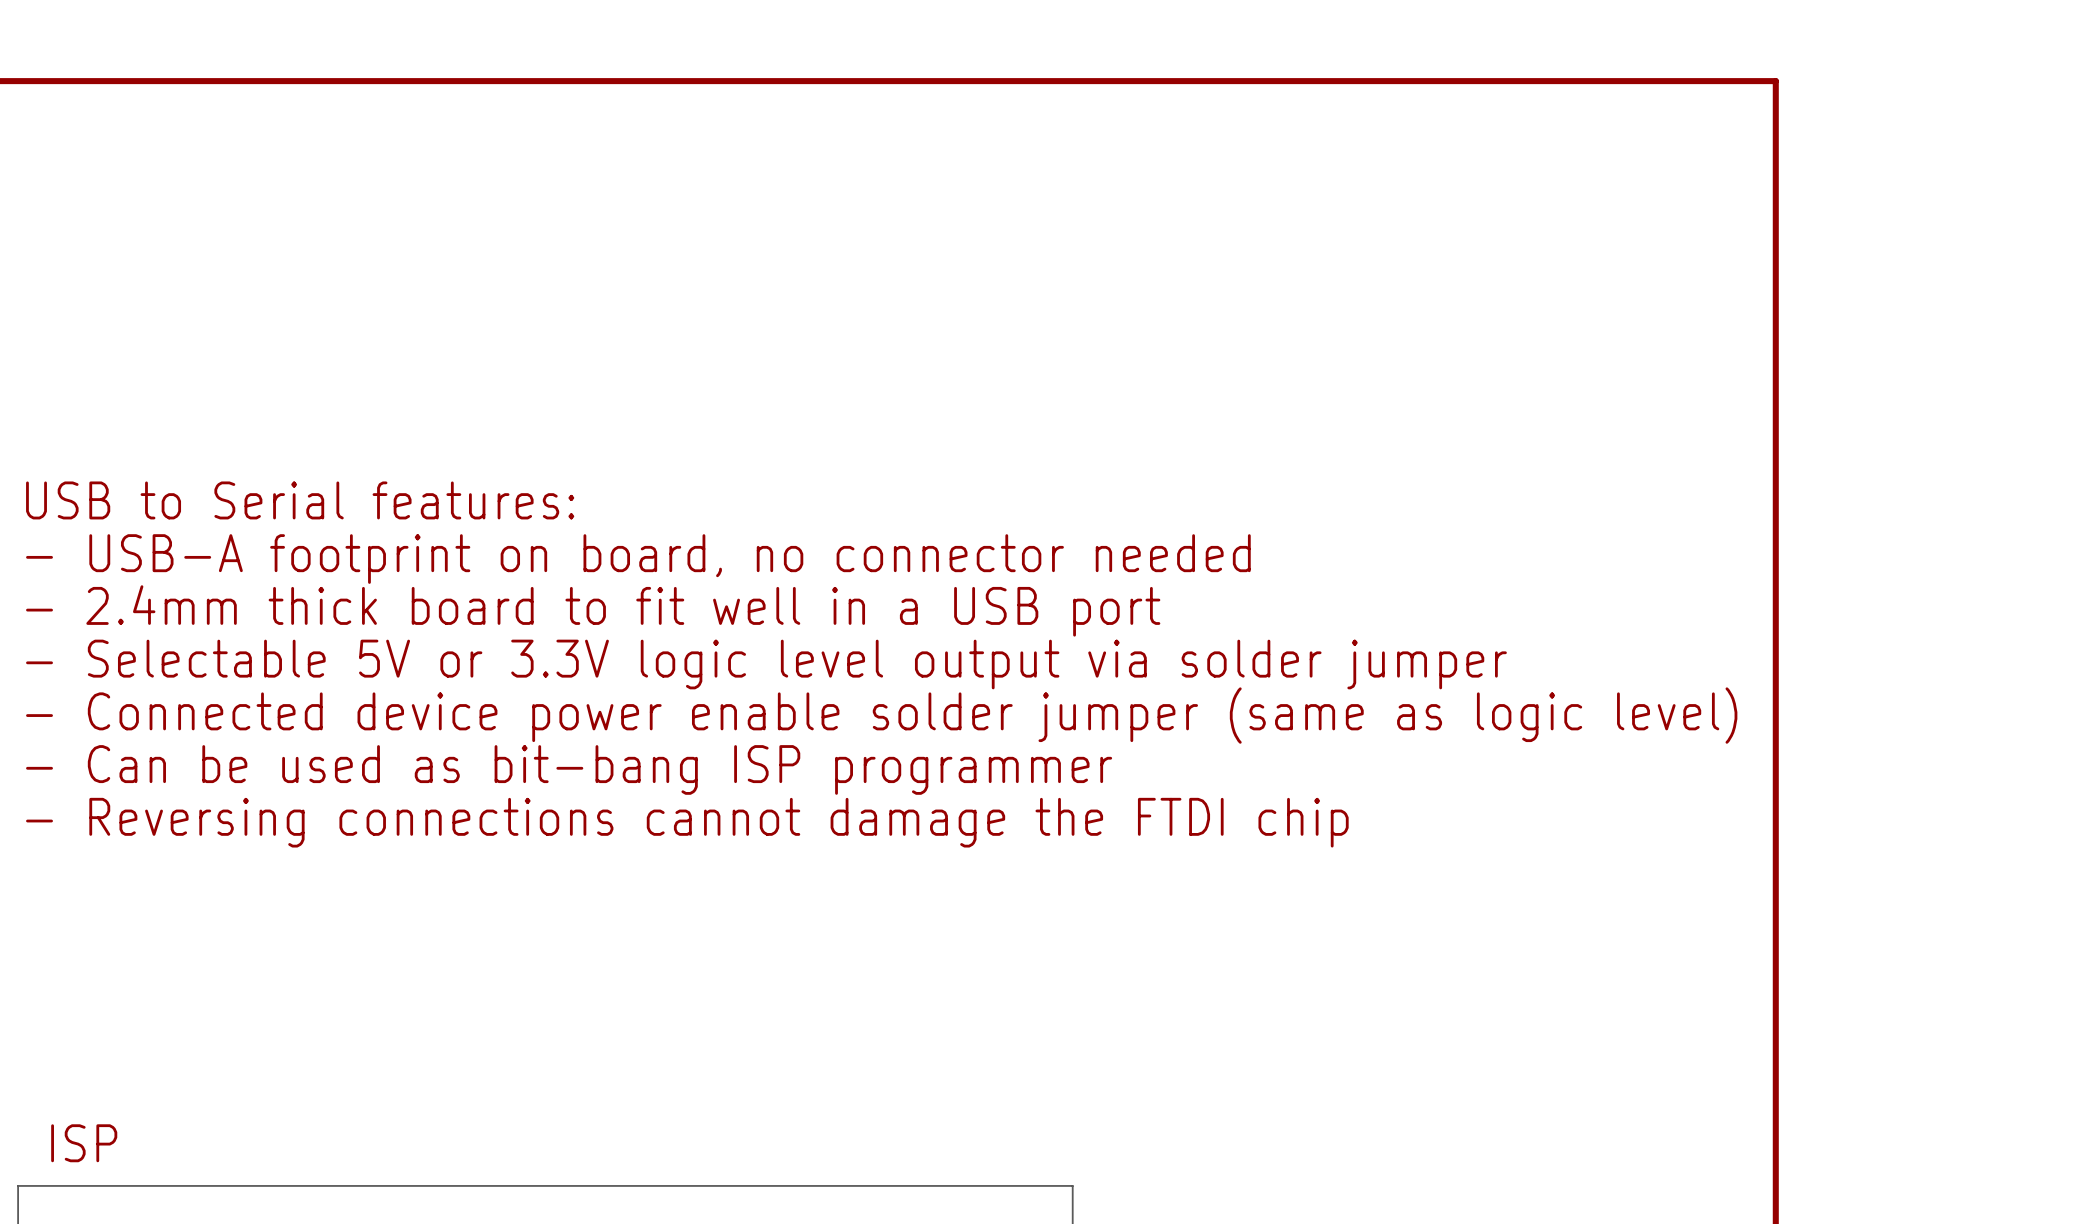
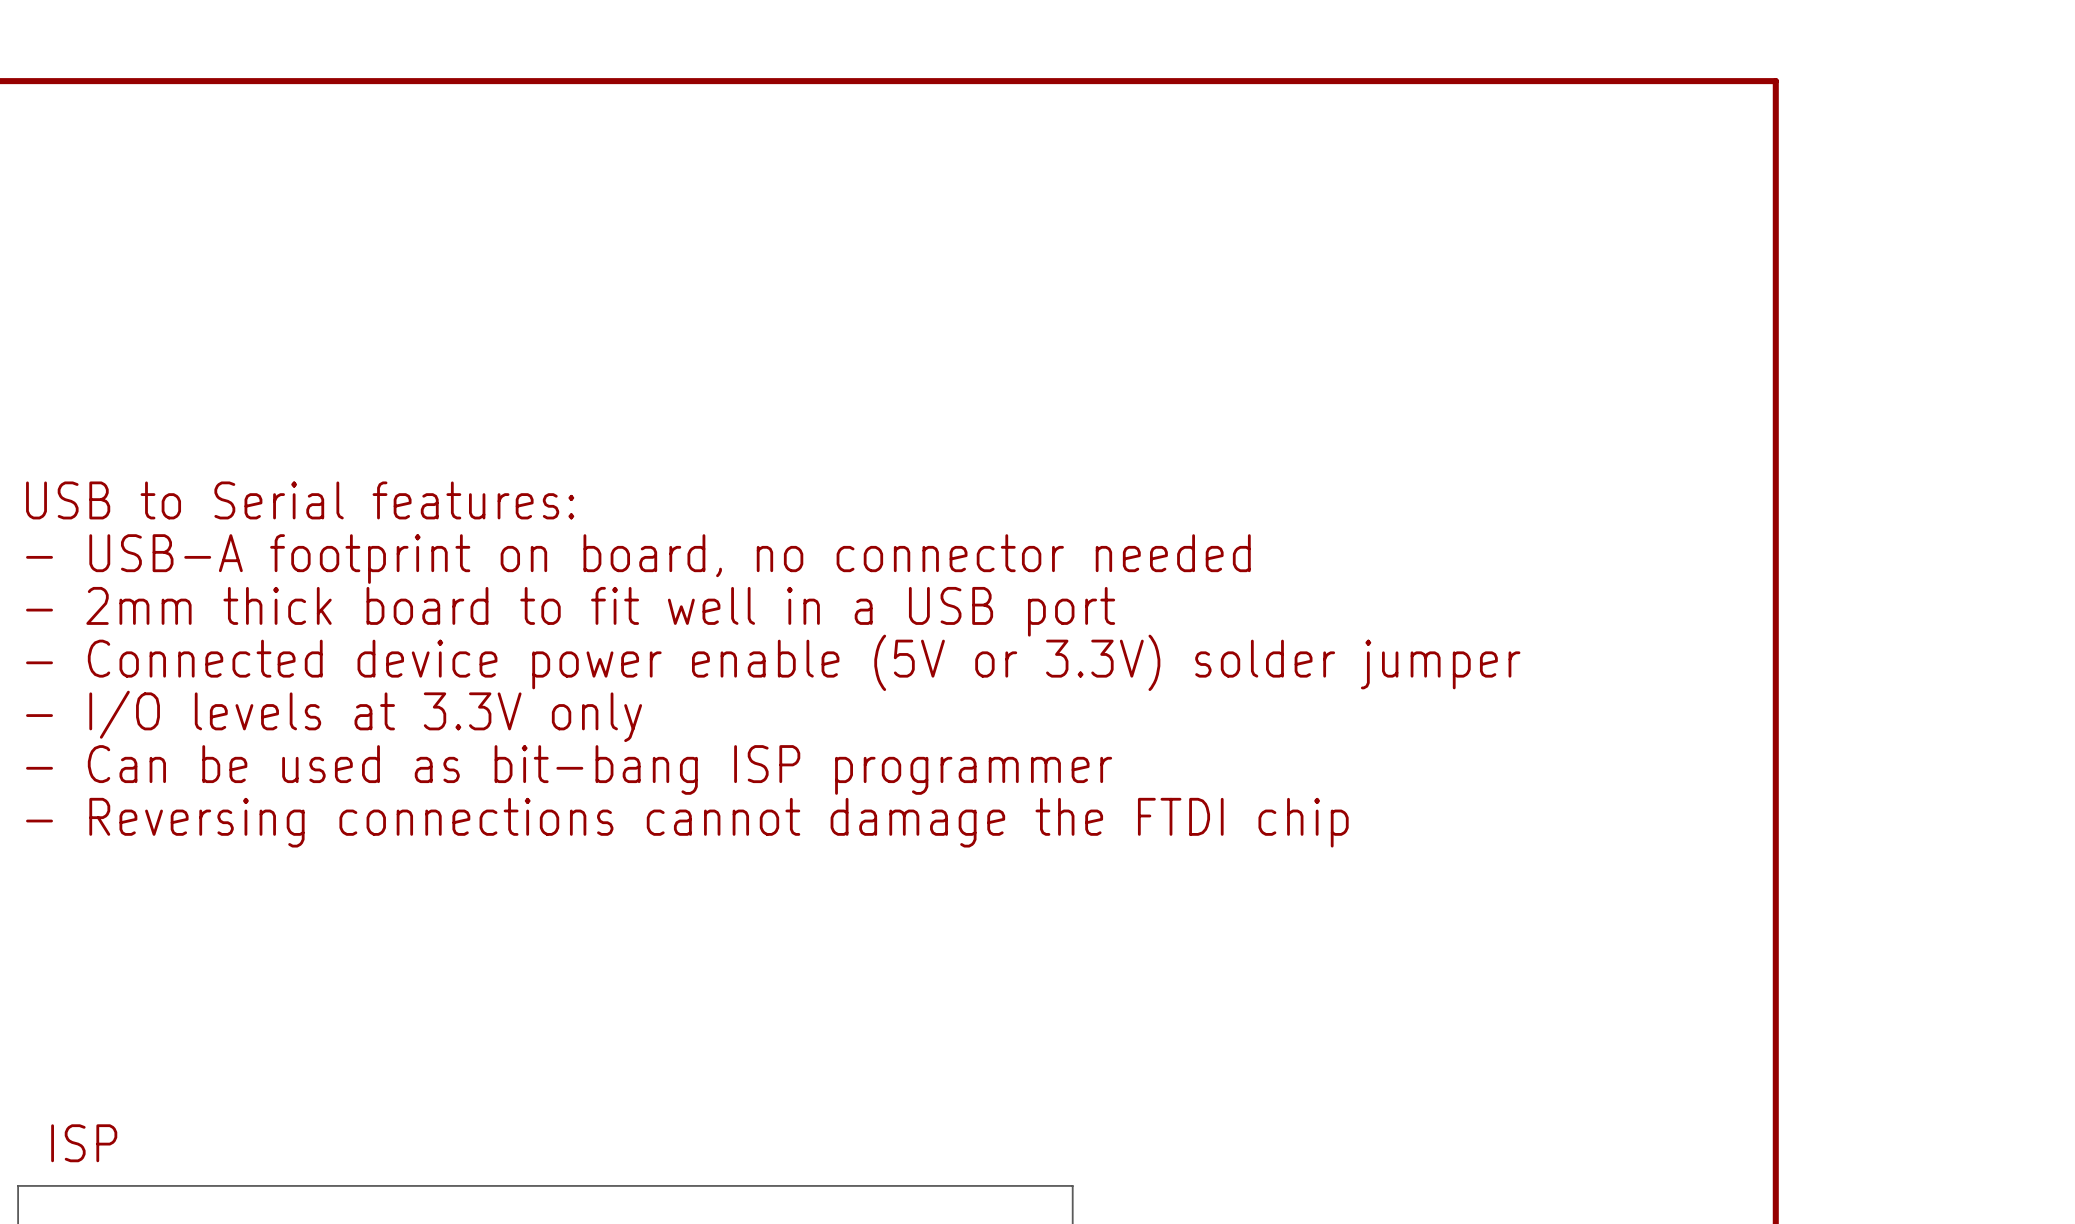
text: - 2.4mm thick board to fit well in a USB port (593, 610) -> - Connected device power enable (5V or 3.3V) solder jumper (773, 662)
text: none -> - 2mm thick board to fit well in a USB port (570, 611)
text: - Selectable 5V or 3.3V logic level output via solder jumper (766, 664) -> - I/O levels at 3.3V only (334, 716)
text: - Connected device power enable solder jumper (same as logic level) (881, 715) -> none

